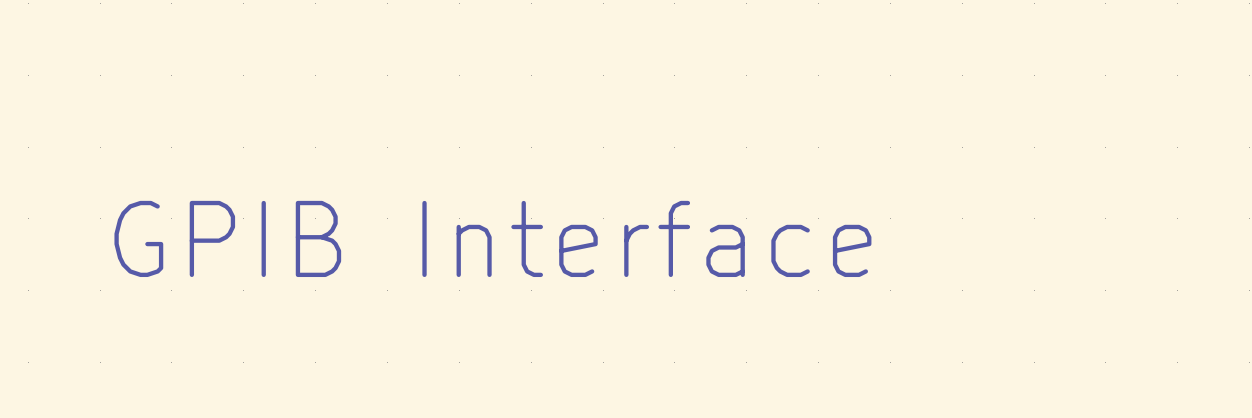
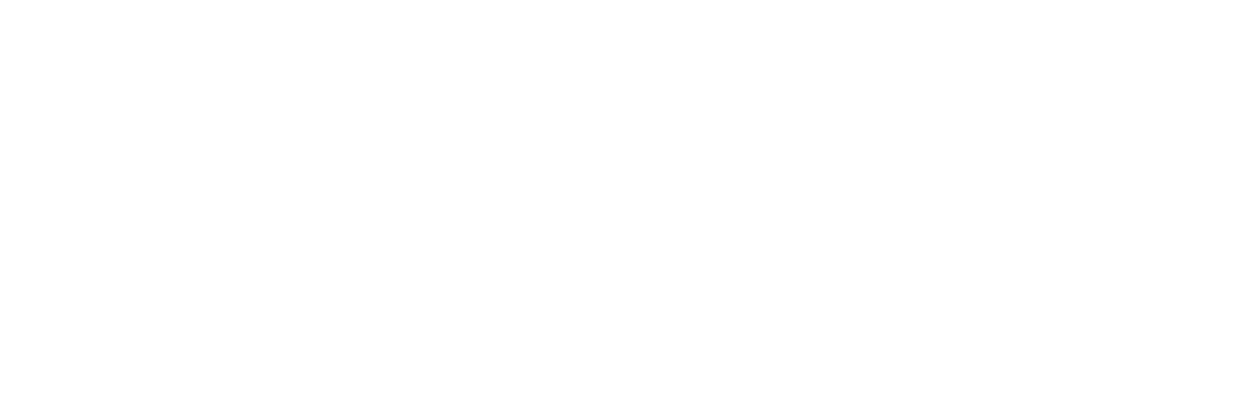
text: GPIB Interface (492, 238) -> none

